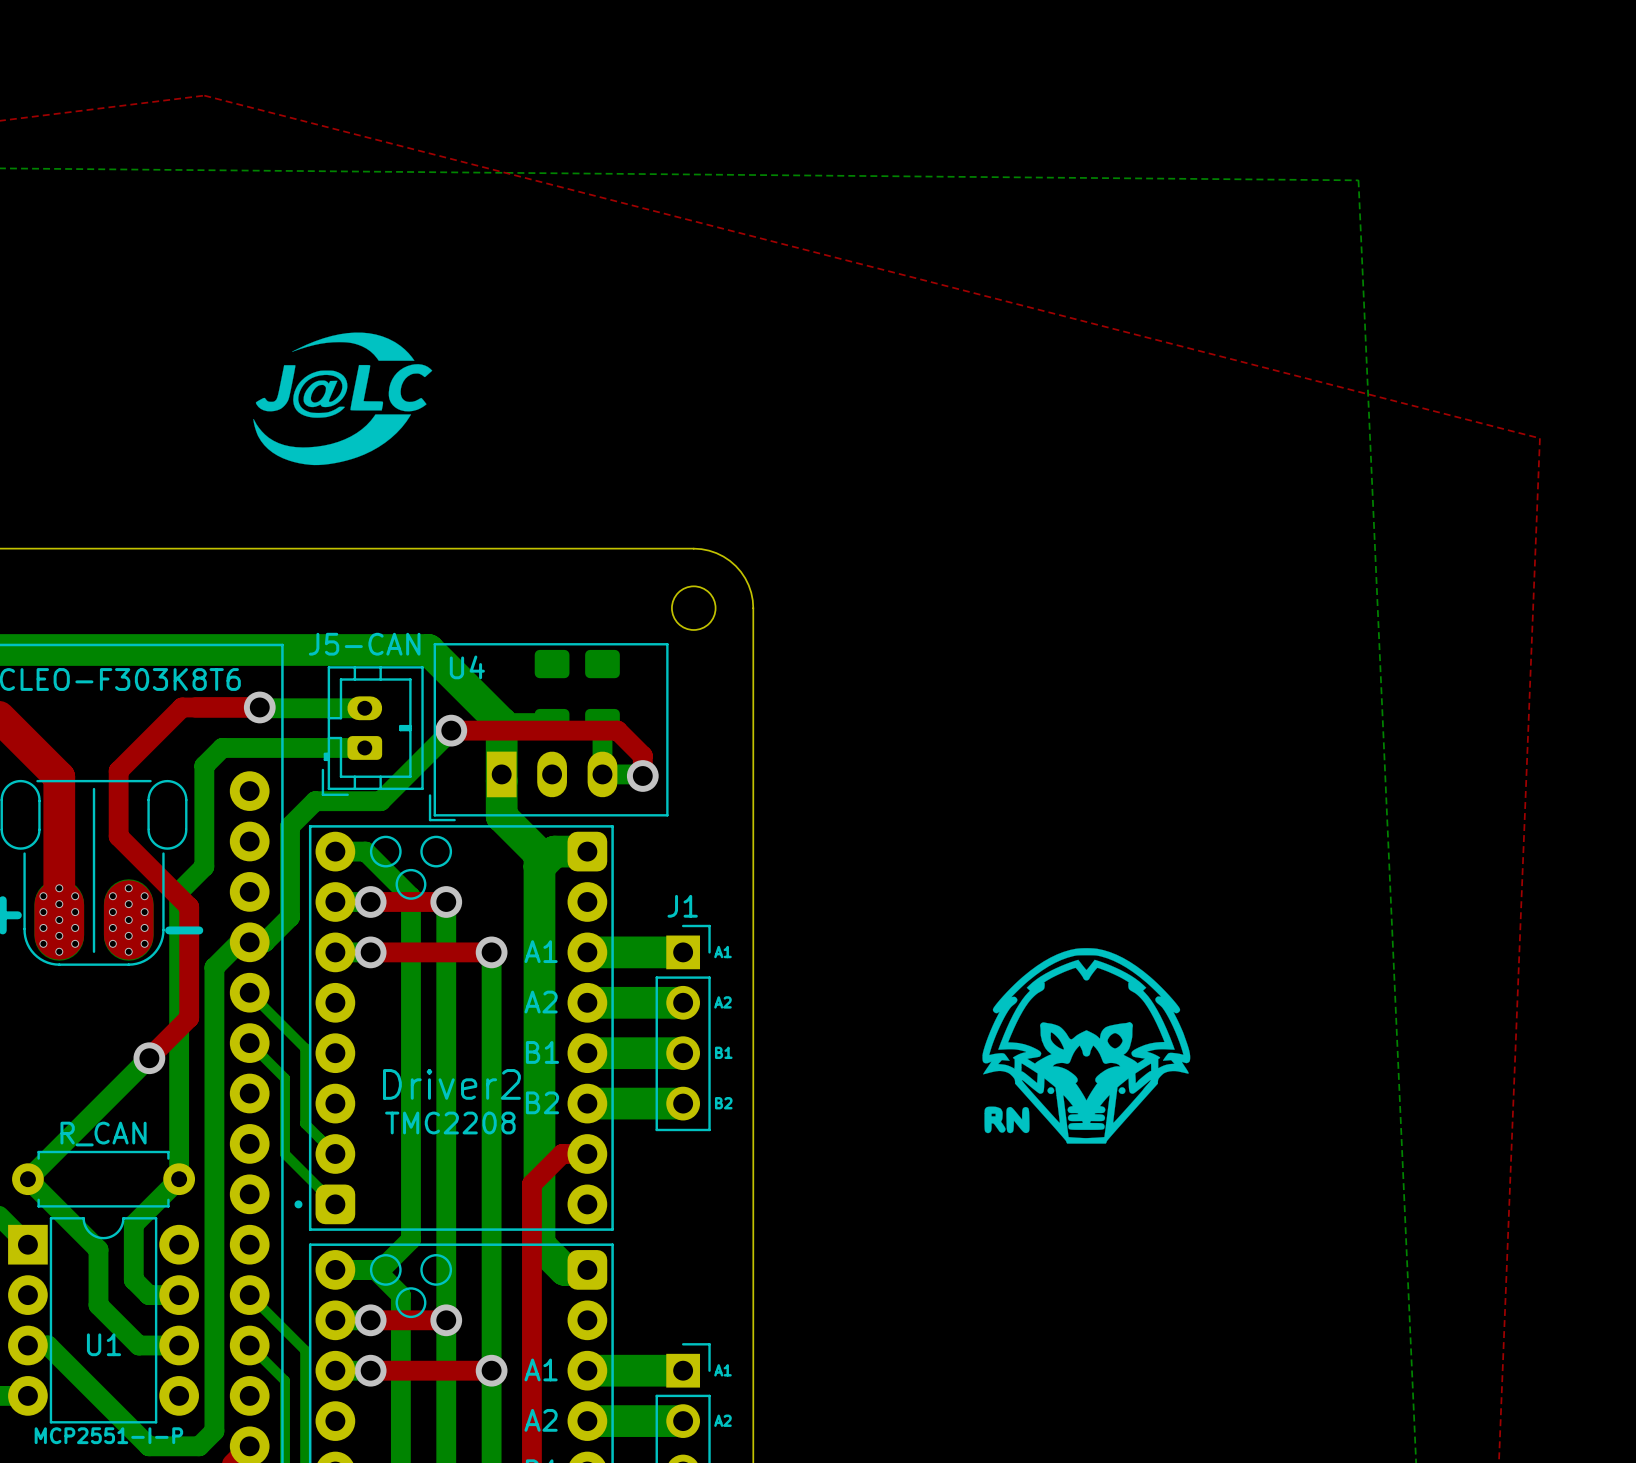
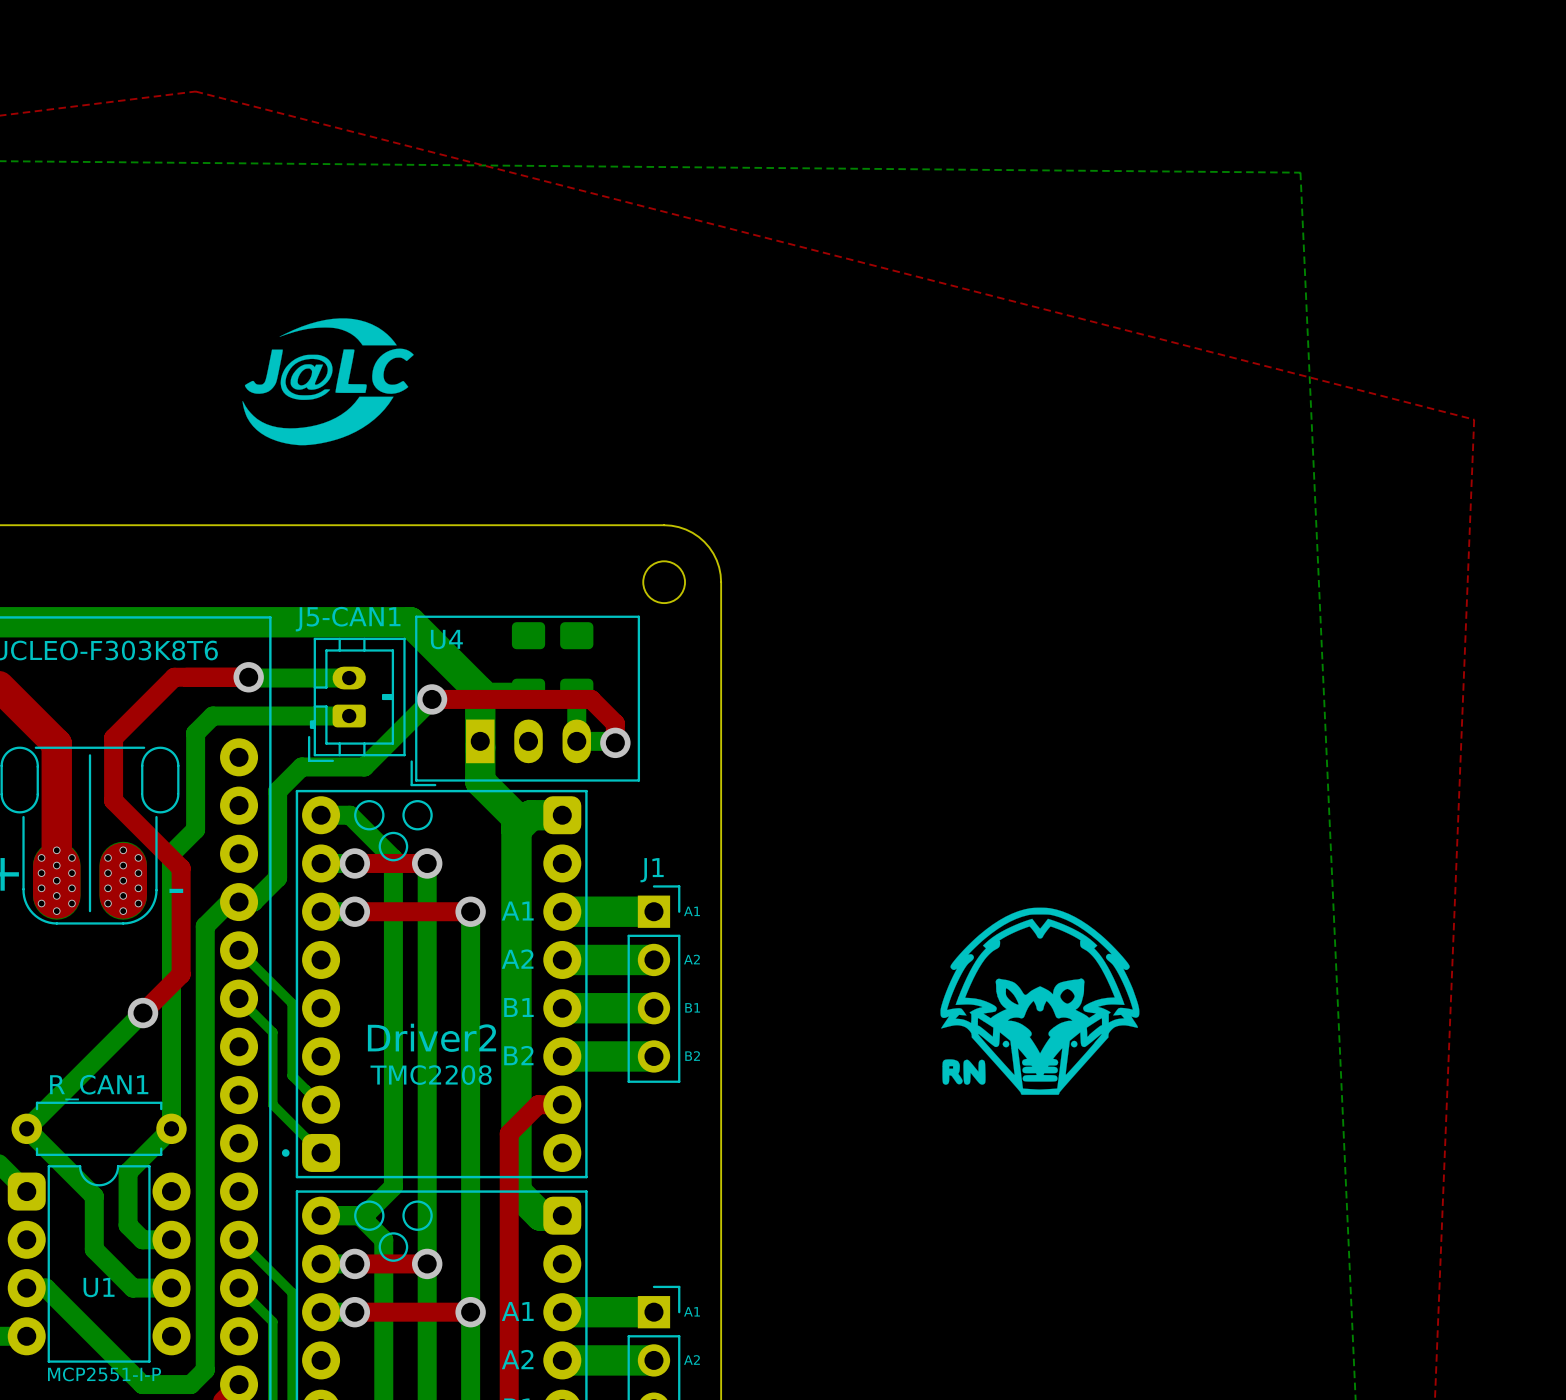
J5-CAN name: J5-CAN (364, 644) -> J5-CAN1 (348, 619)
R_CAN name: R_CAN (103, 1134) -> R_CAN1 (99, 1087)
U1 footprint: [8, 1217, 199, 1424] -> [7, 1165, 191, 1363]

